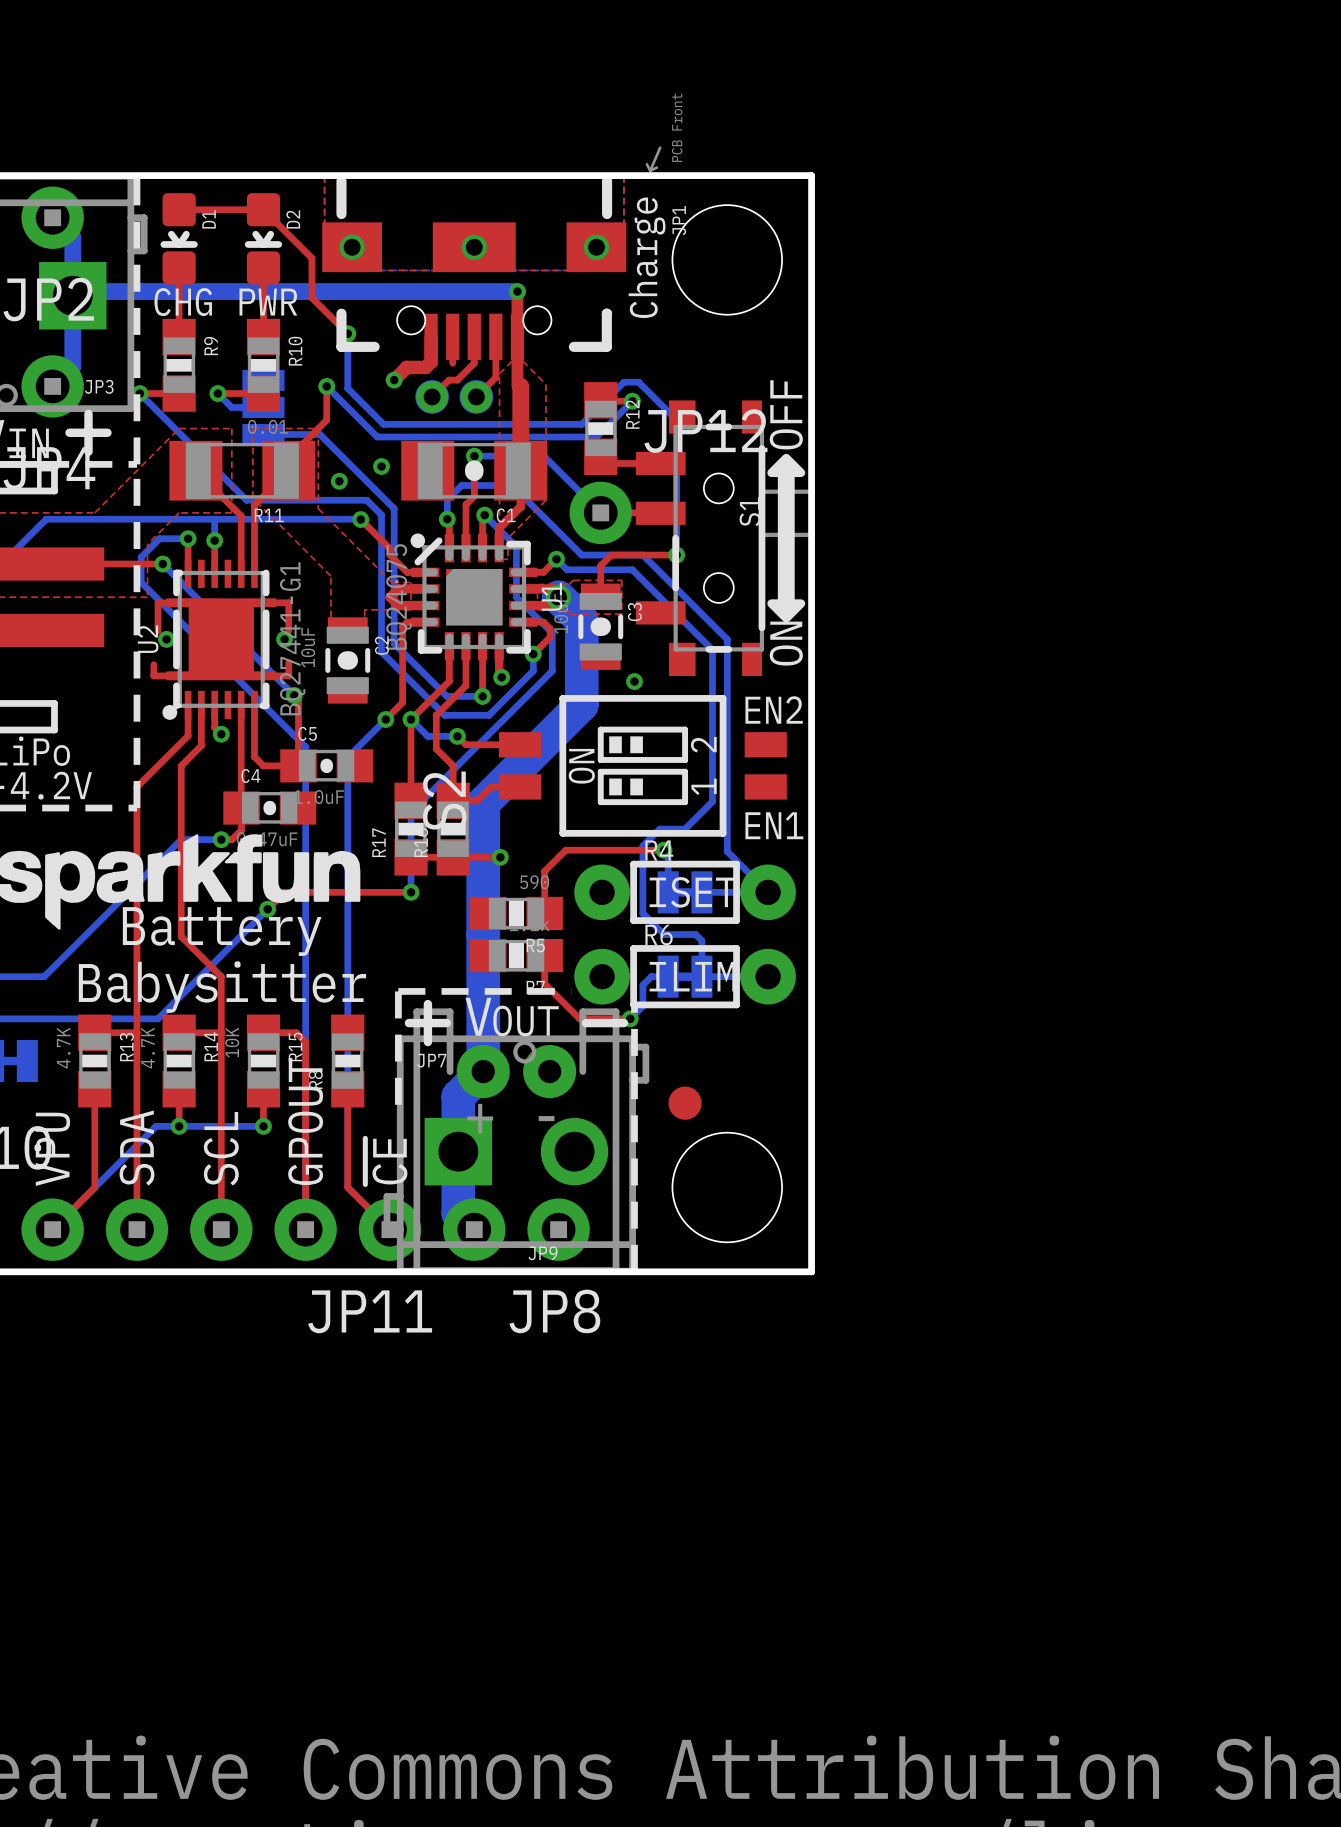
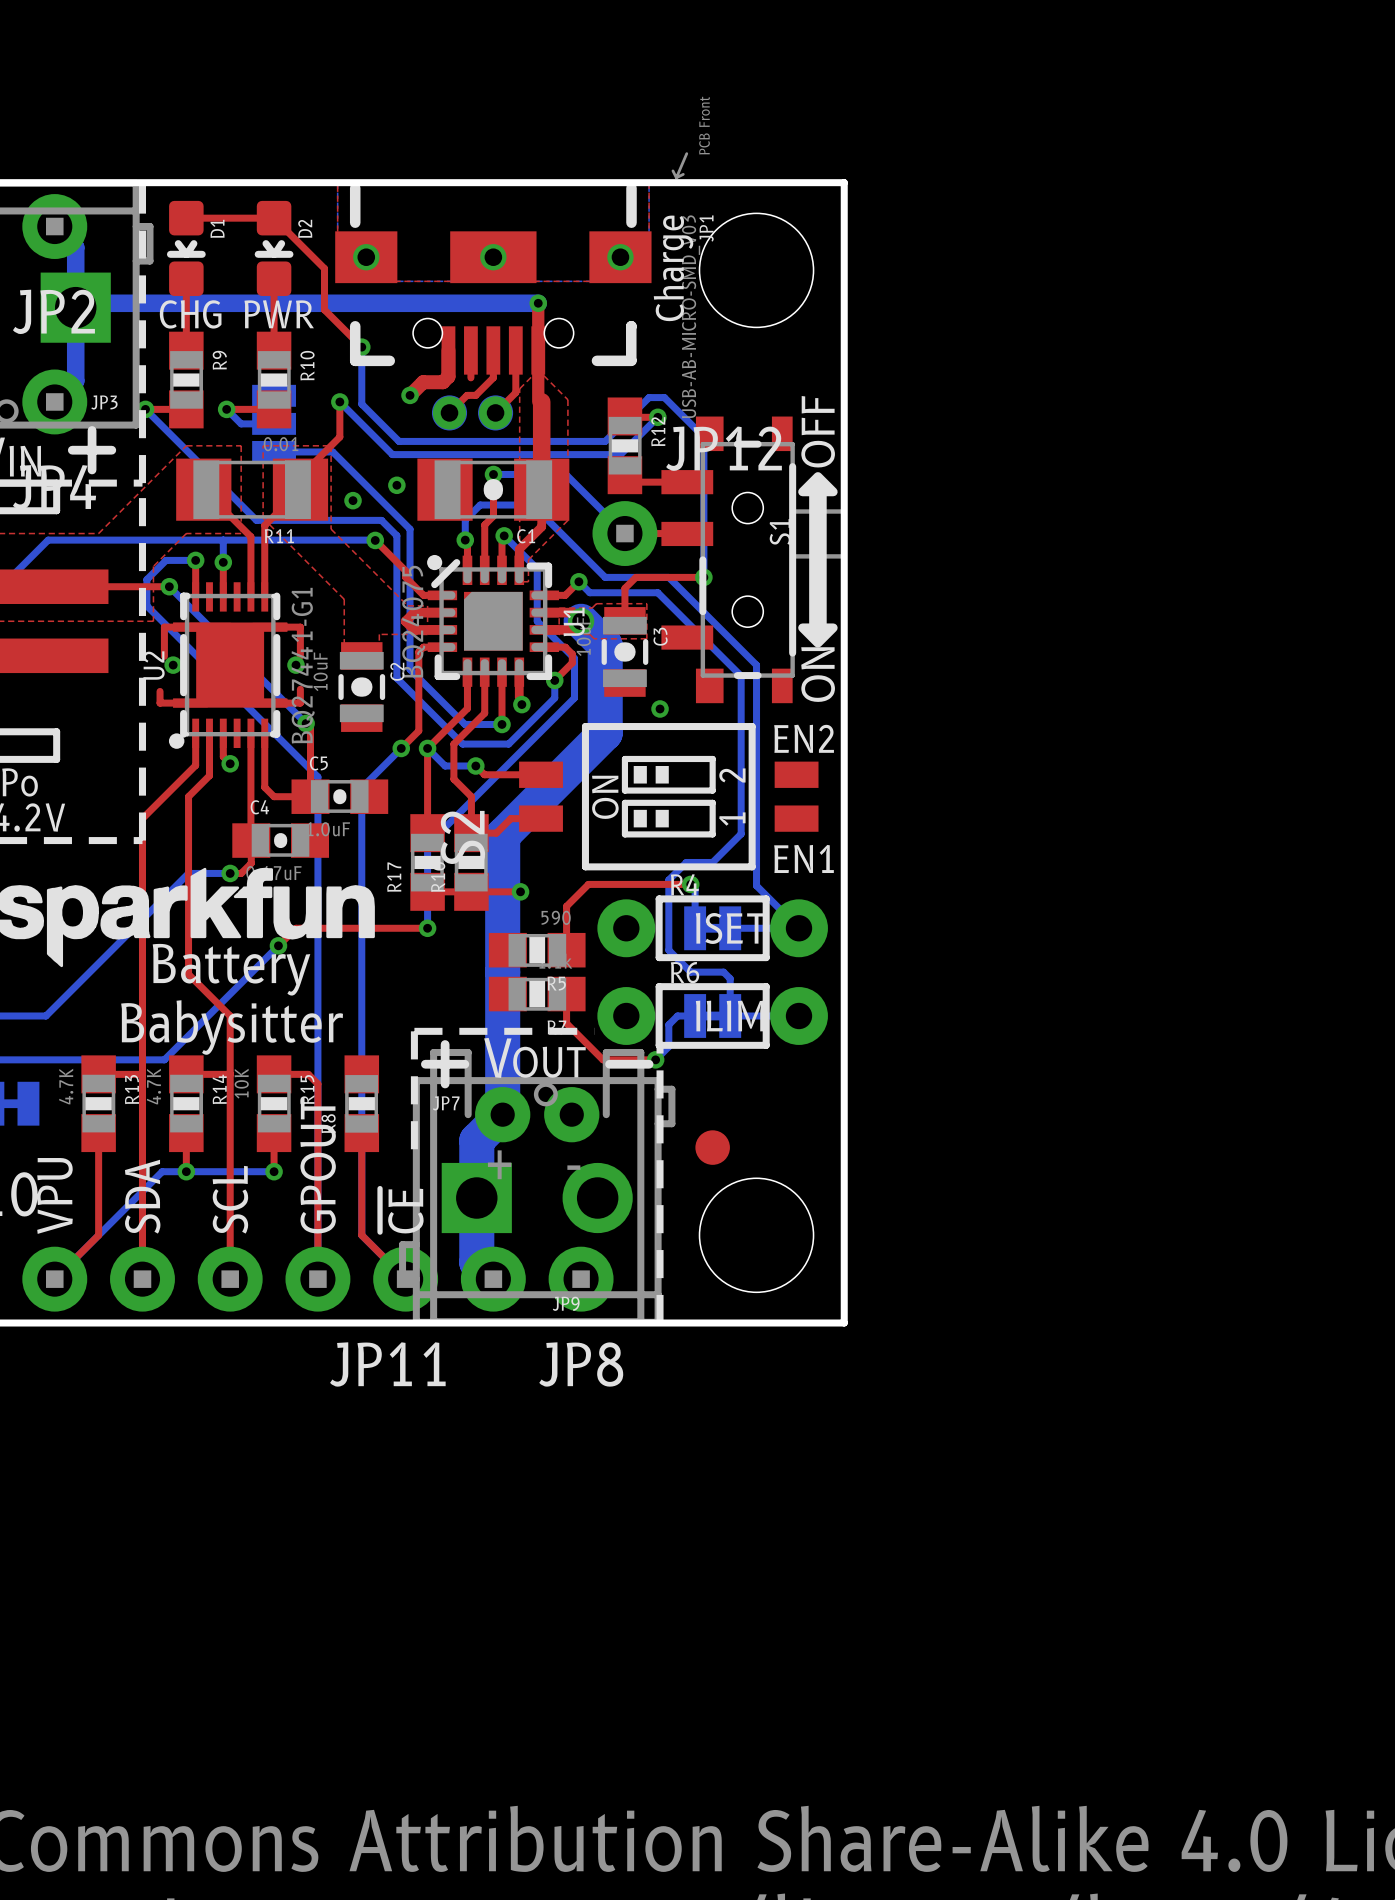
JP1 value: none -> USB-AB-MICRO-SMD_V03 (691, 316)

